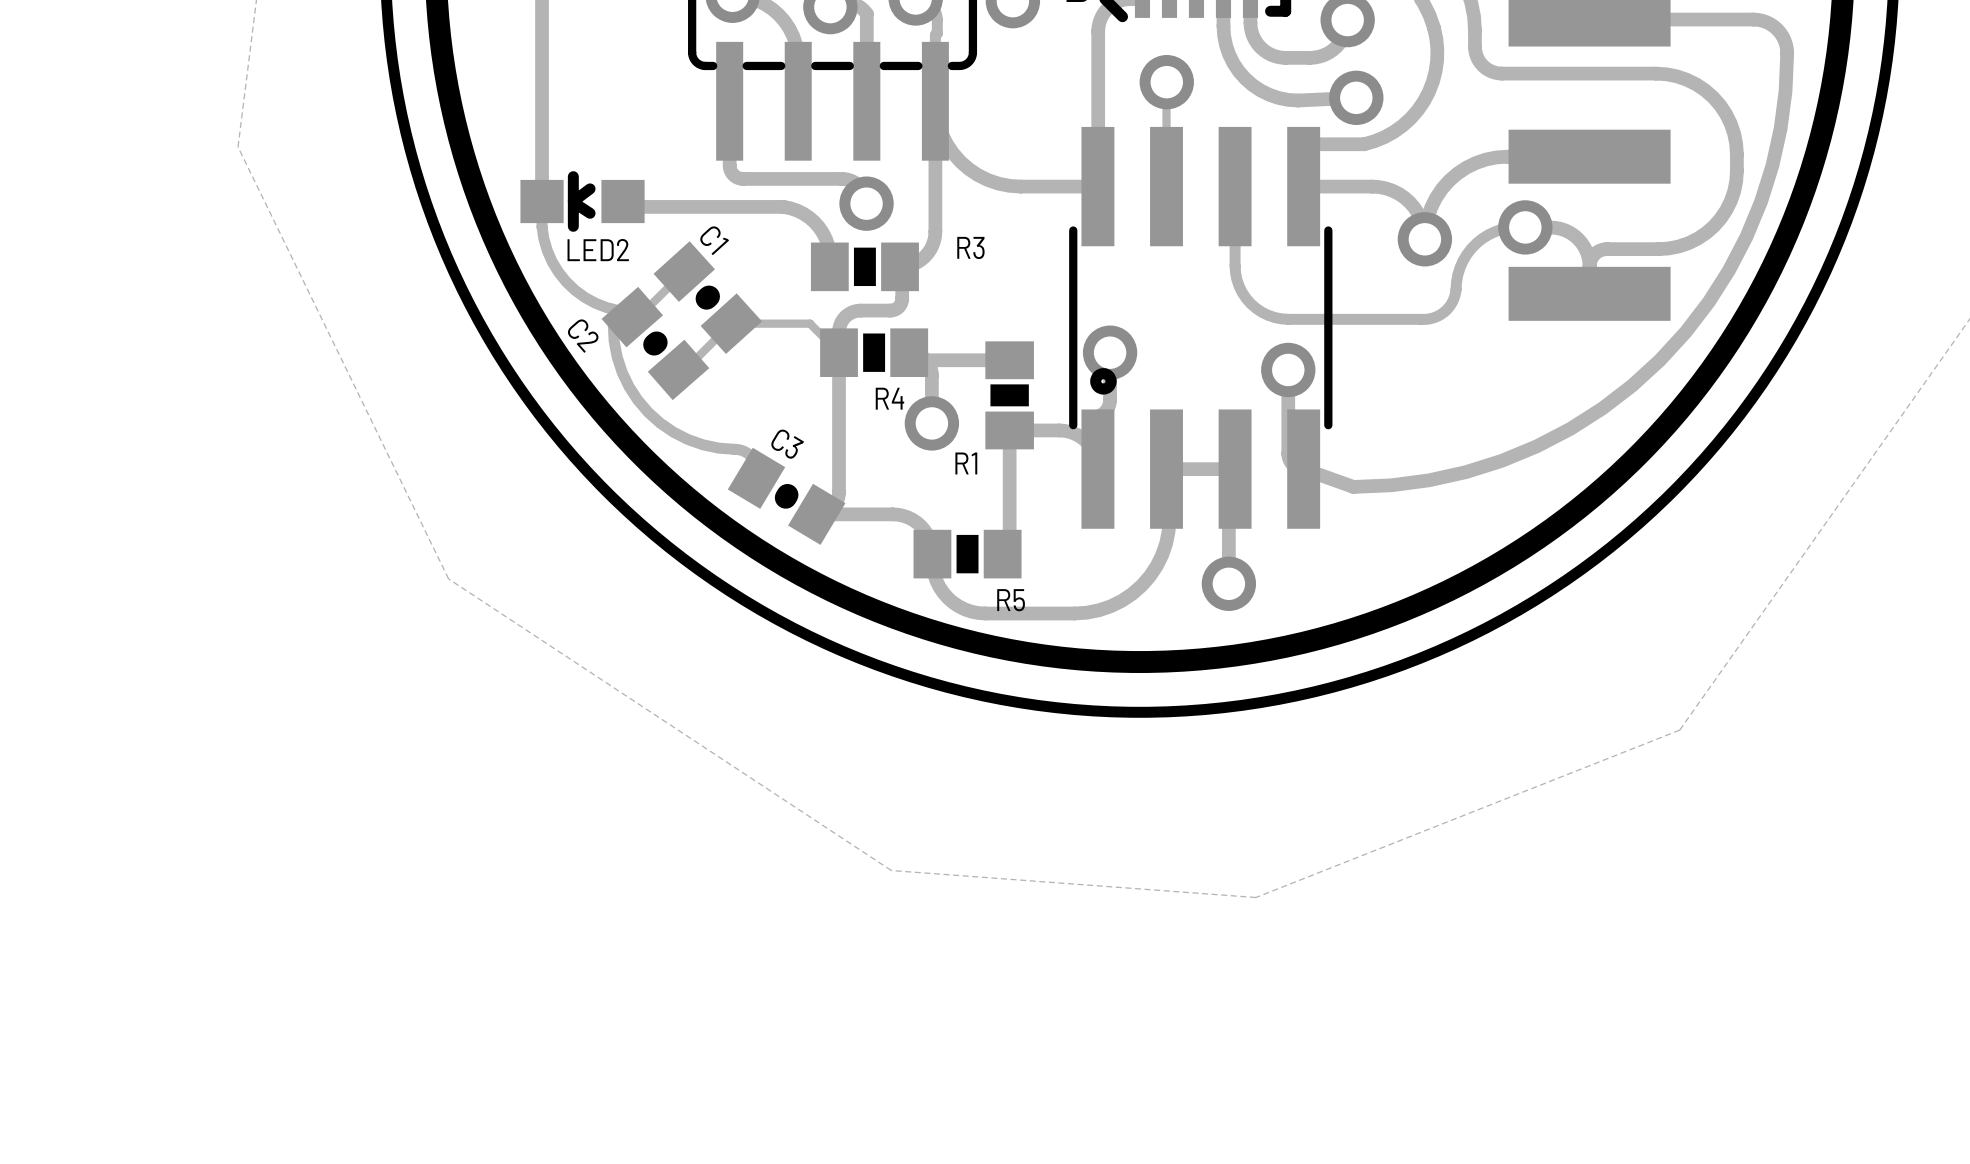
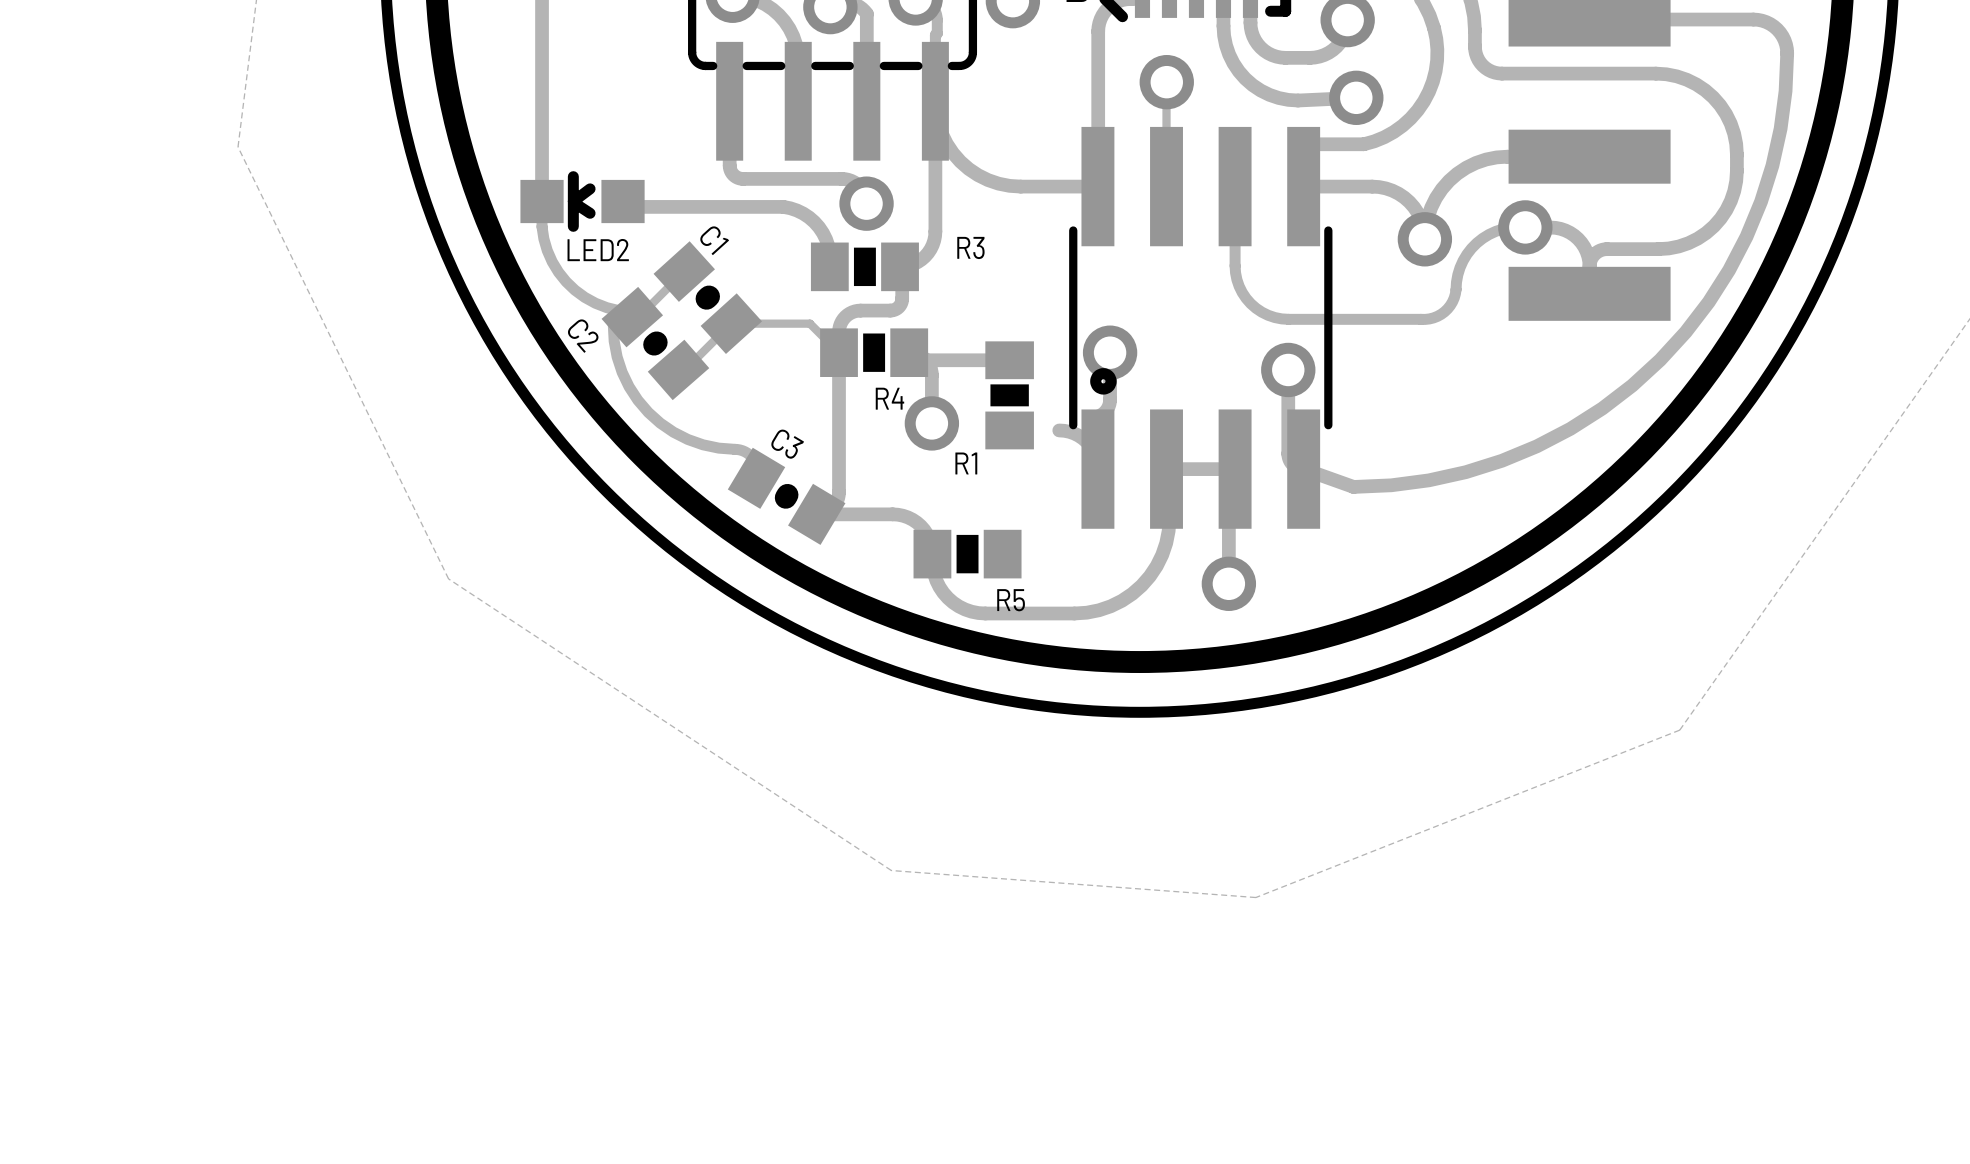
track: (1059, 430) (1009, 430) (1009, 547) -> none

